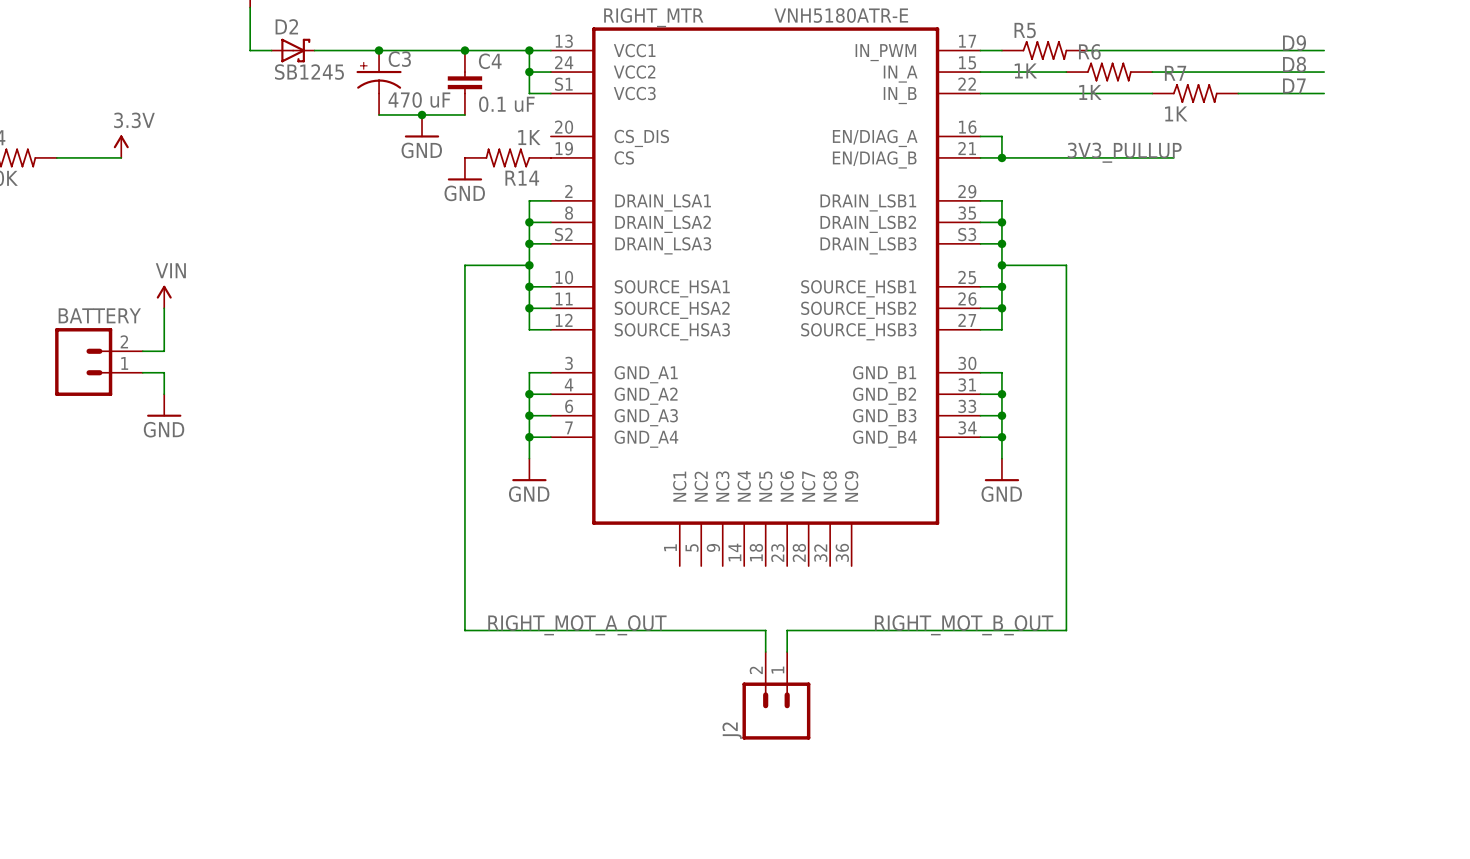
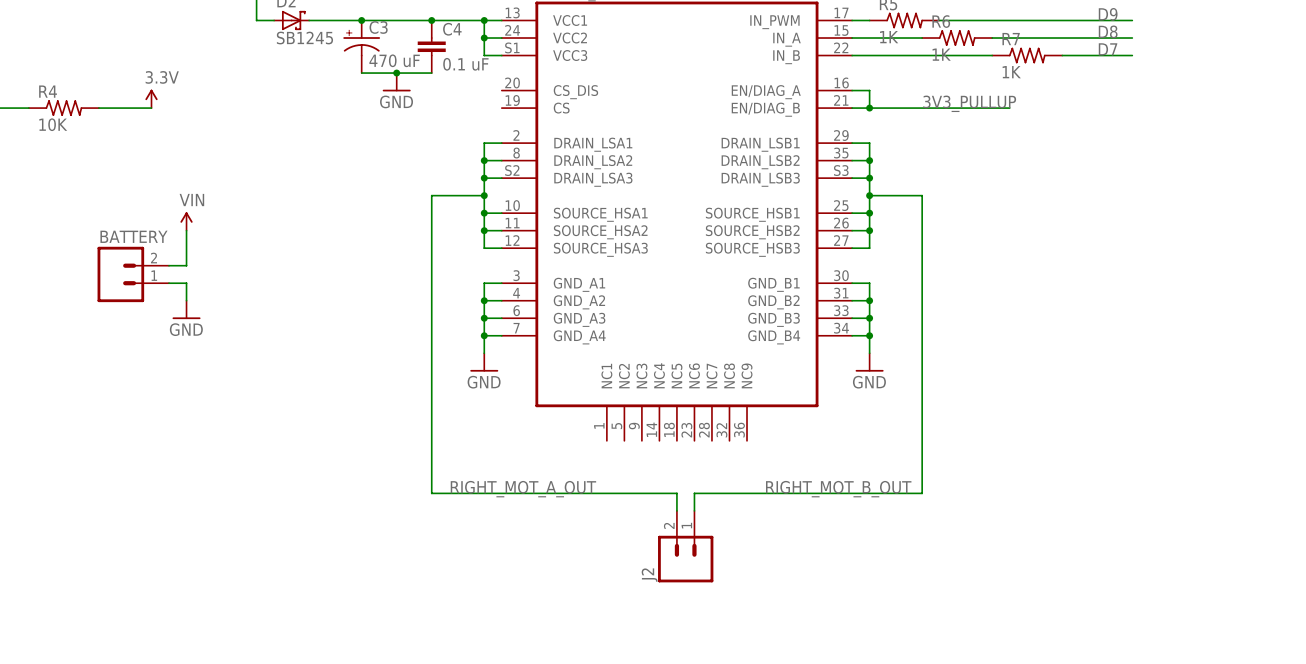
R14: 1K (507, 157) -> none
power symbol: GND (464, 169) -> none

